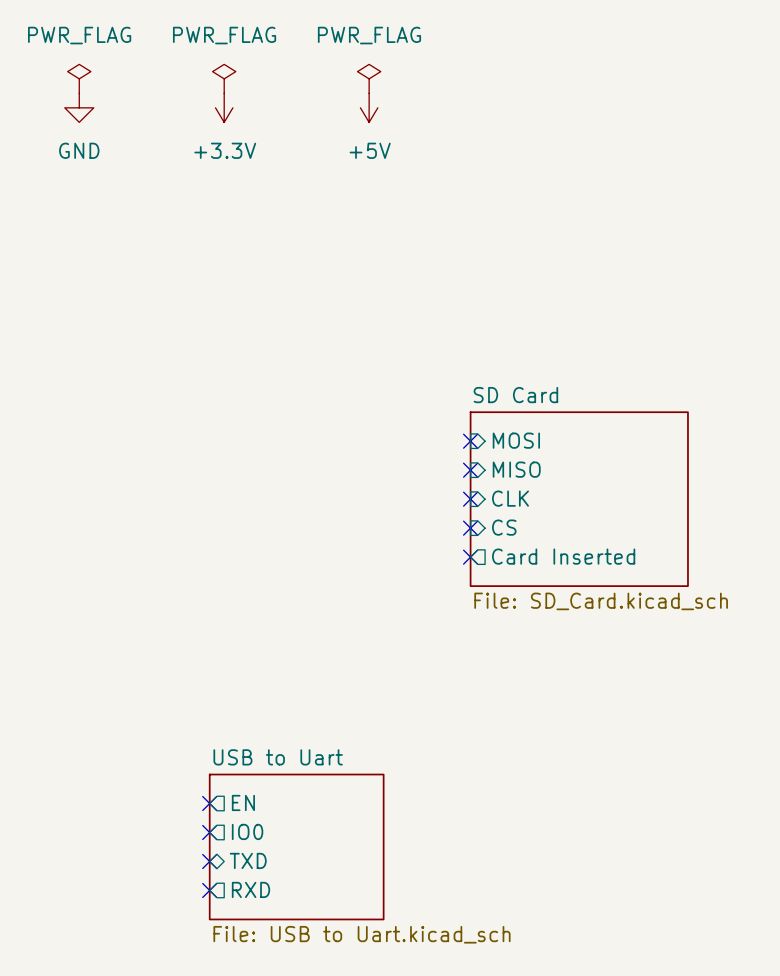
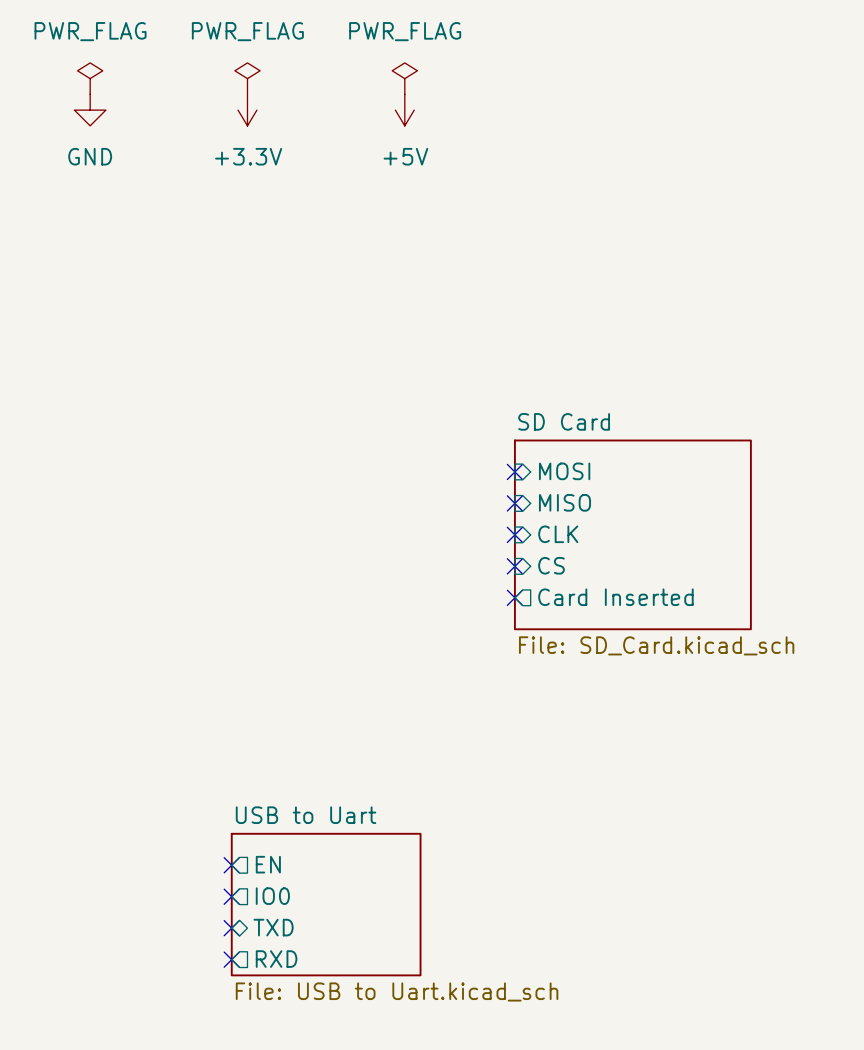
sheet USB to Uart shape: [208, 773, 385, 921] -> [230, 832, 422, 977]

